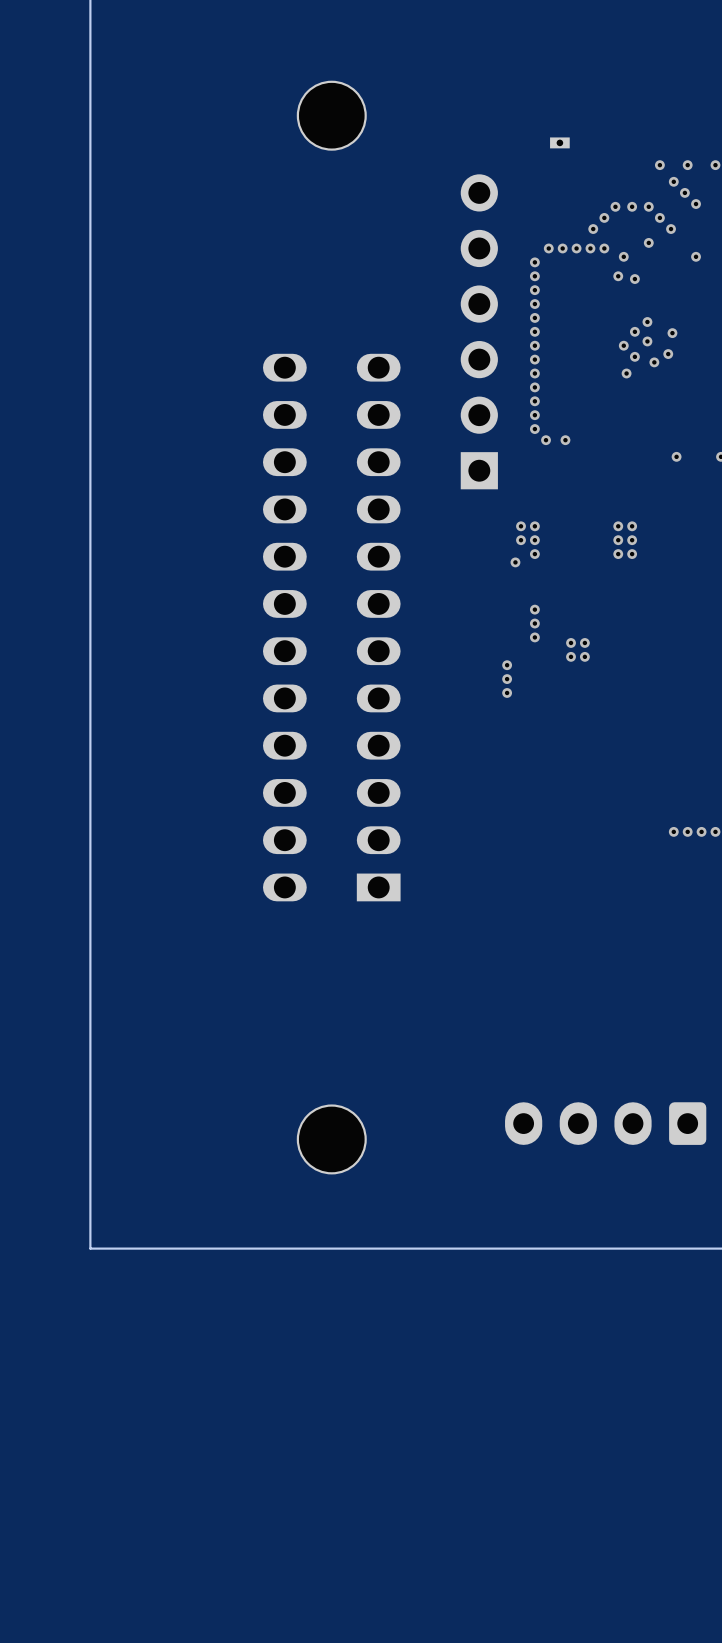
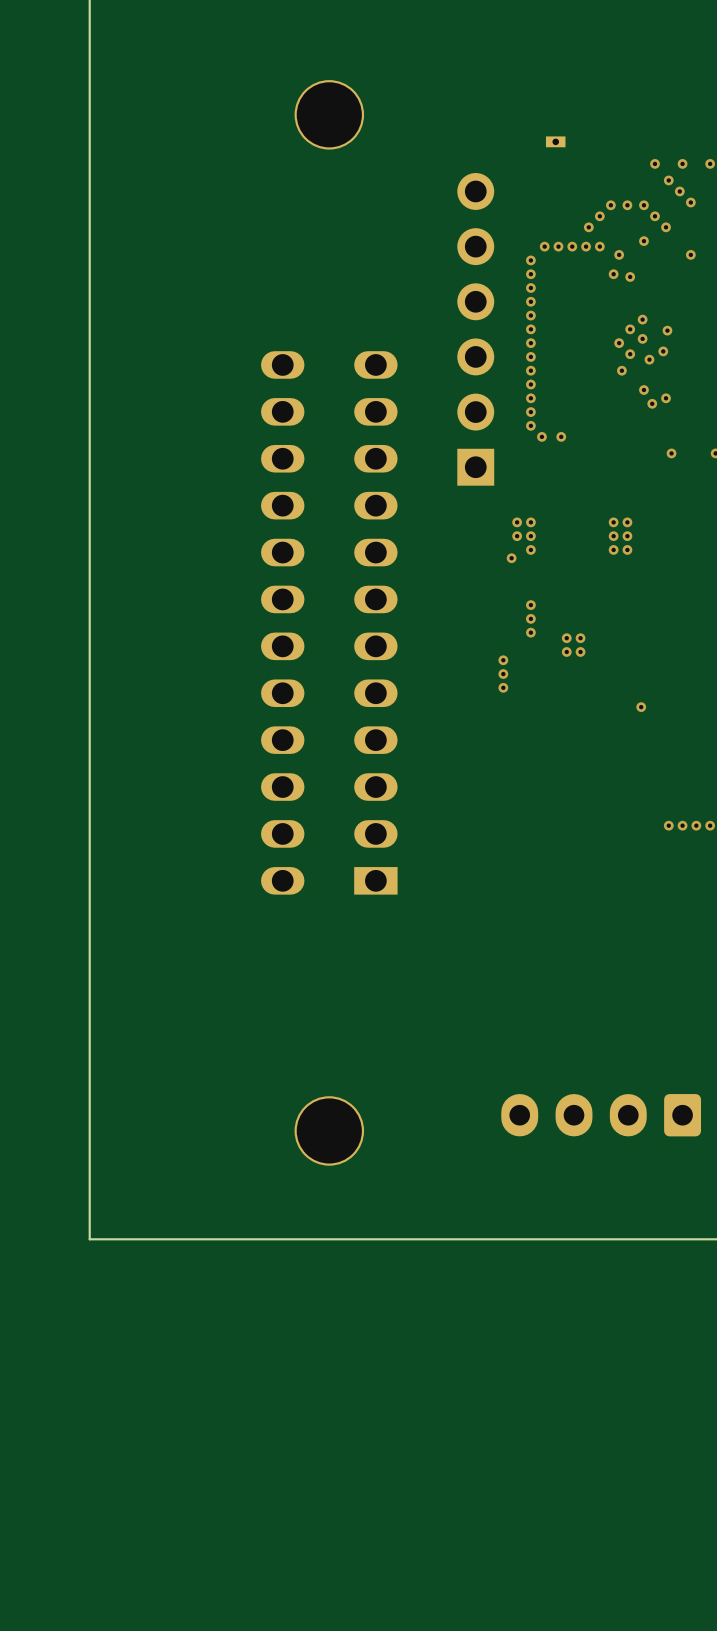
via: none -> (643, 390)
via: none -> (666, 398)
via: none -> (652, 403)
via: none -> (641, 707)

